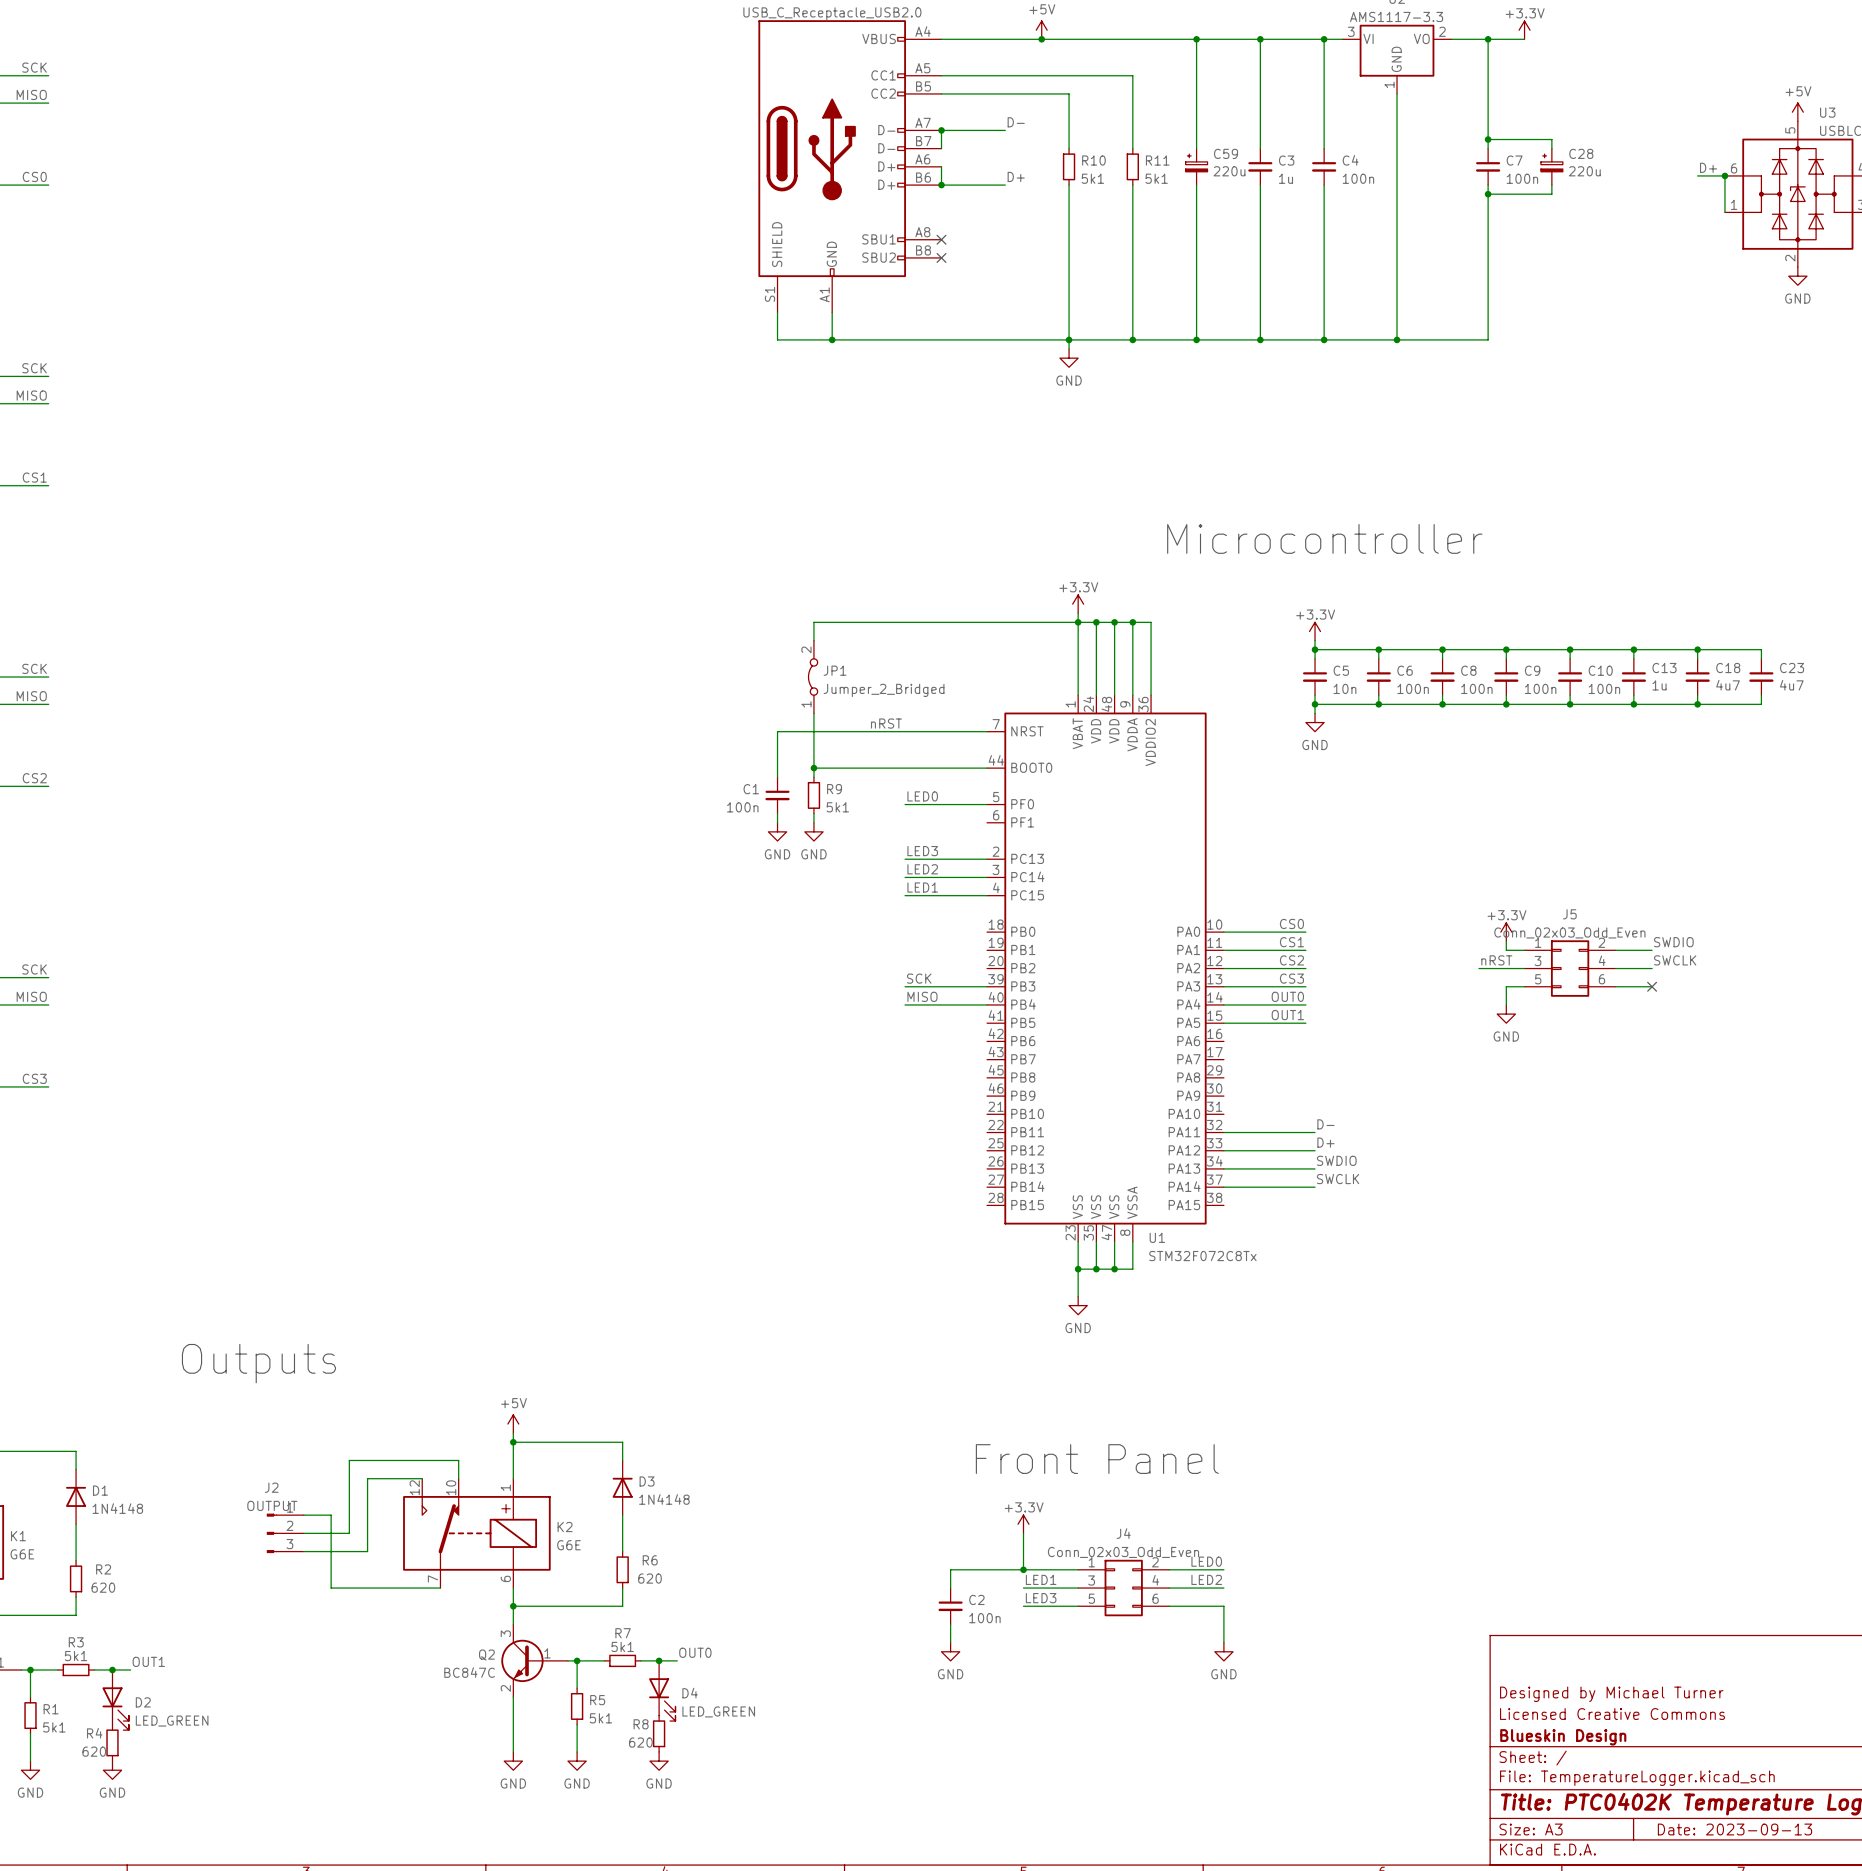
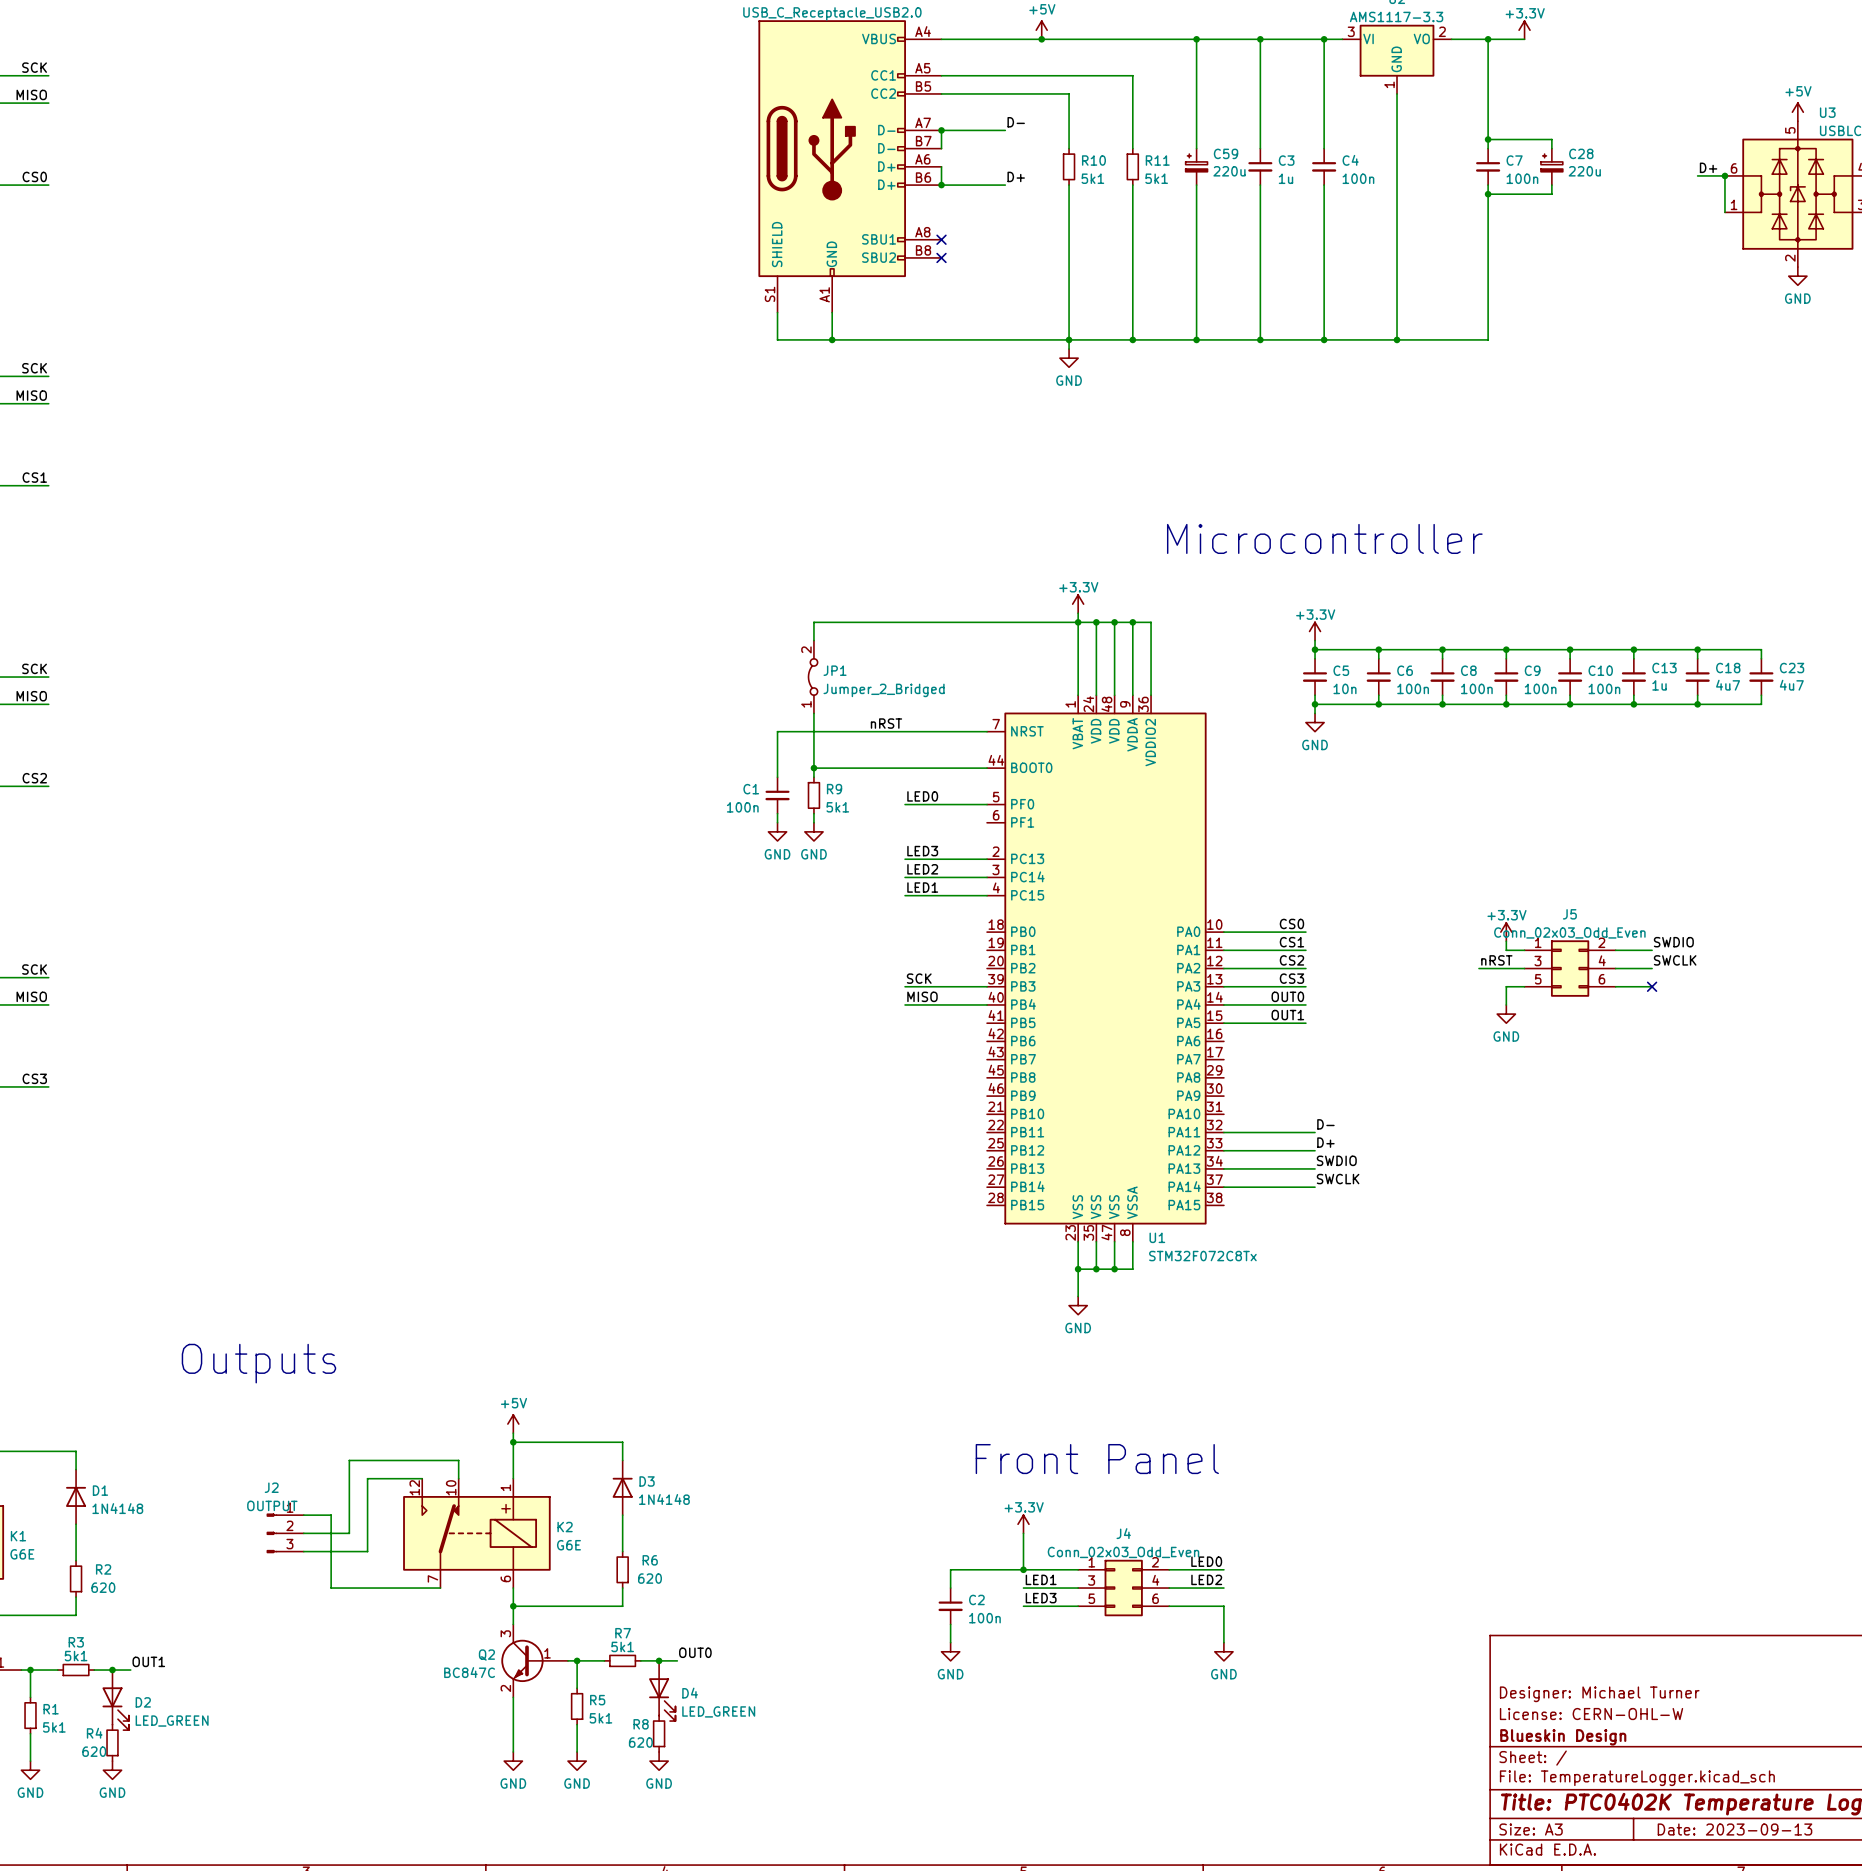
title block: Designed by Michael Turner (1611, 1694) -> Designer: Michael Turner (1599, 1694)
title block: Licensed Creative Commons (1612, 1714) -> License: CERN-OHL-W (1591, 1714)

